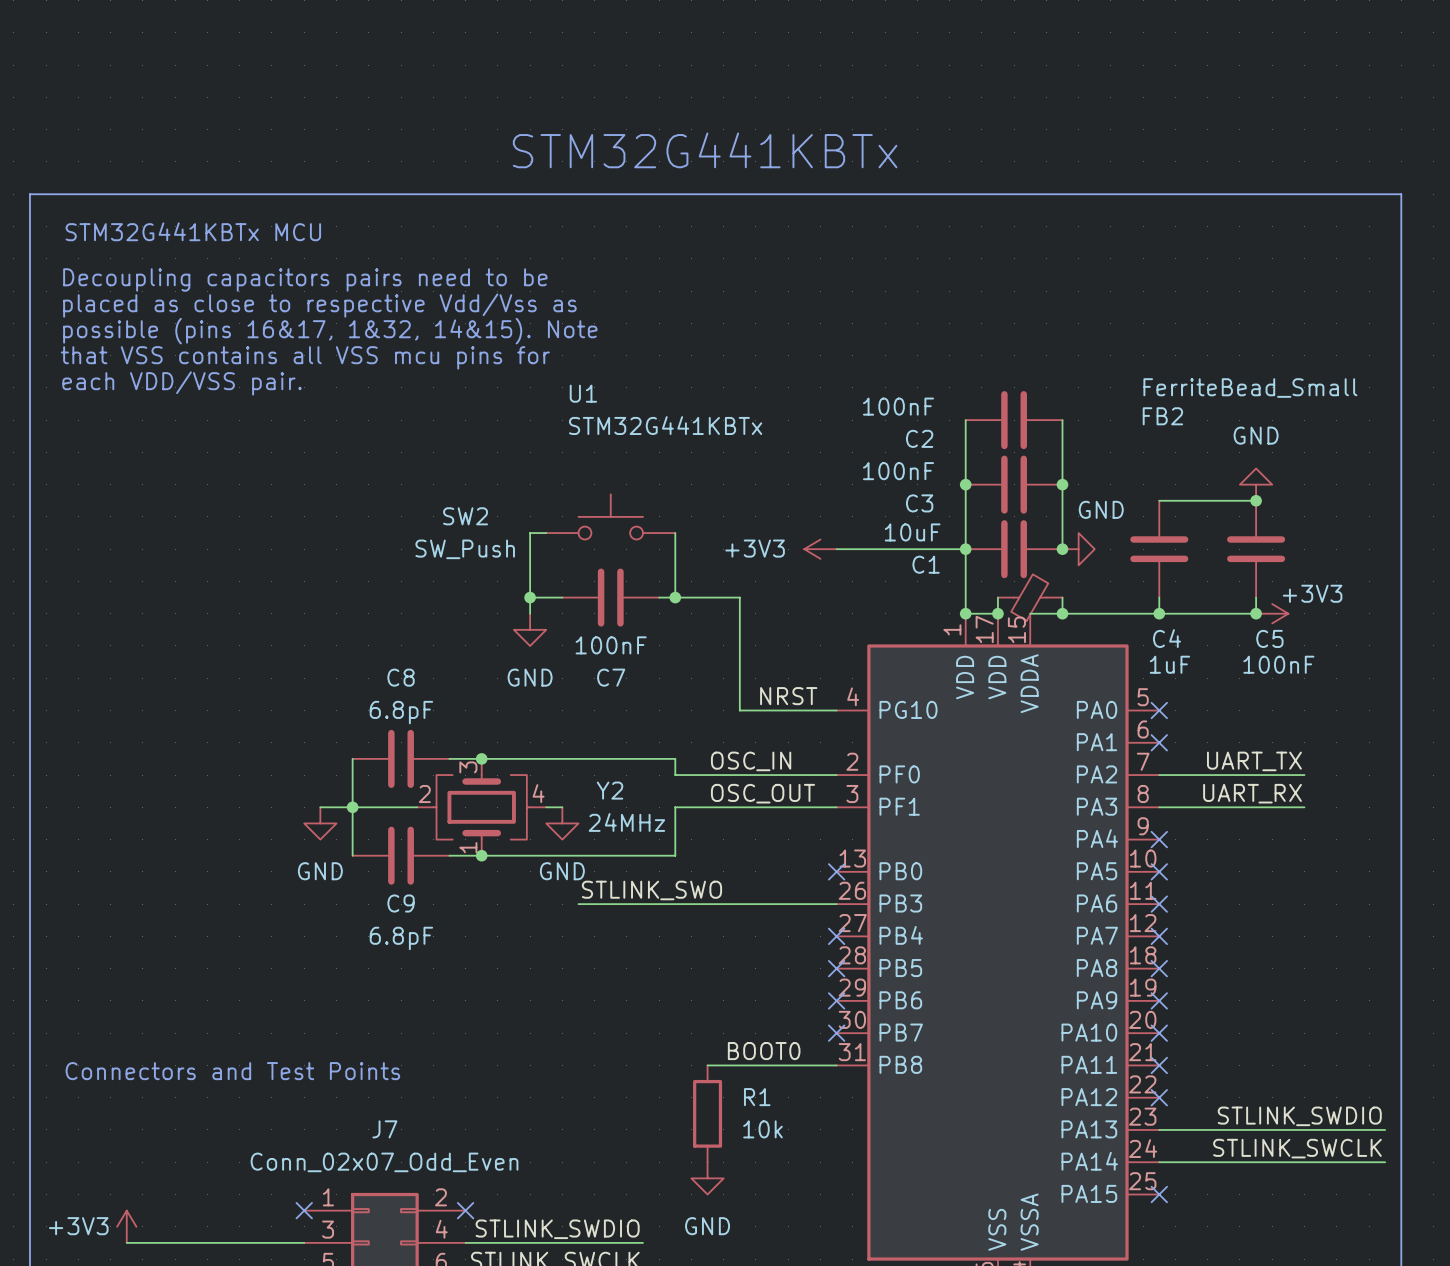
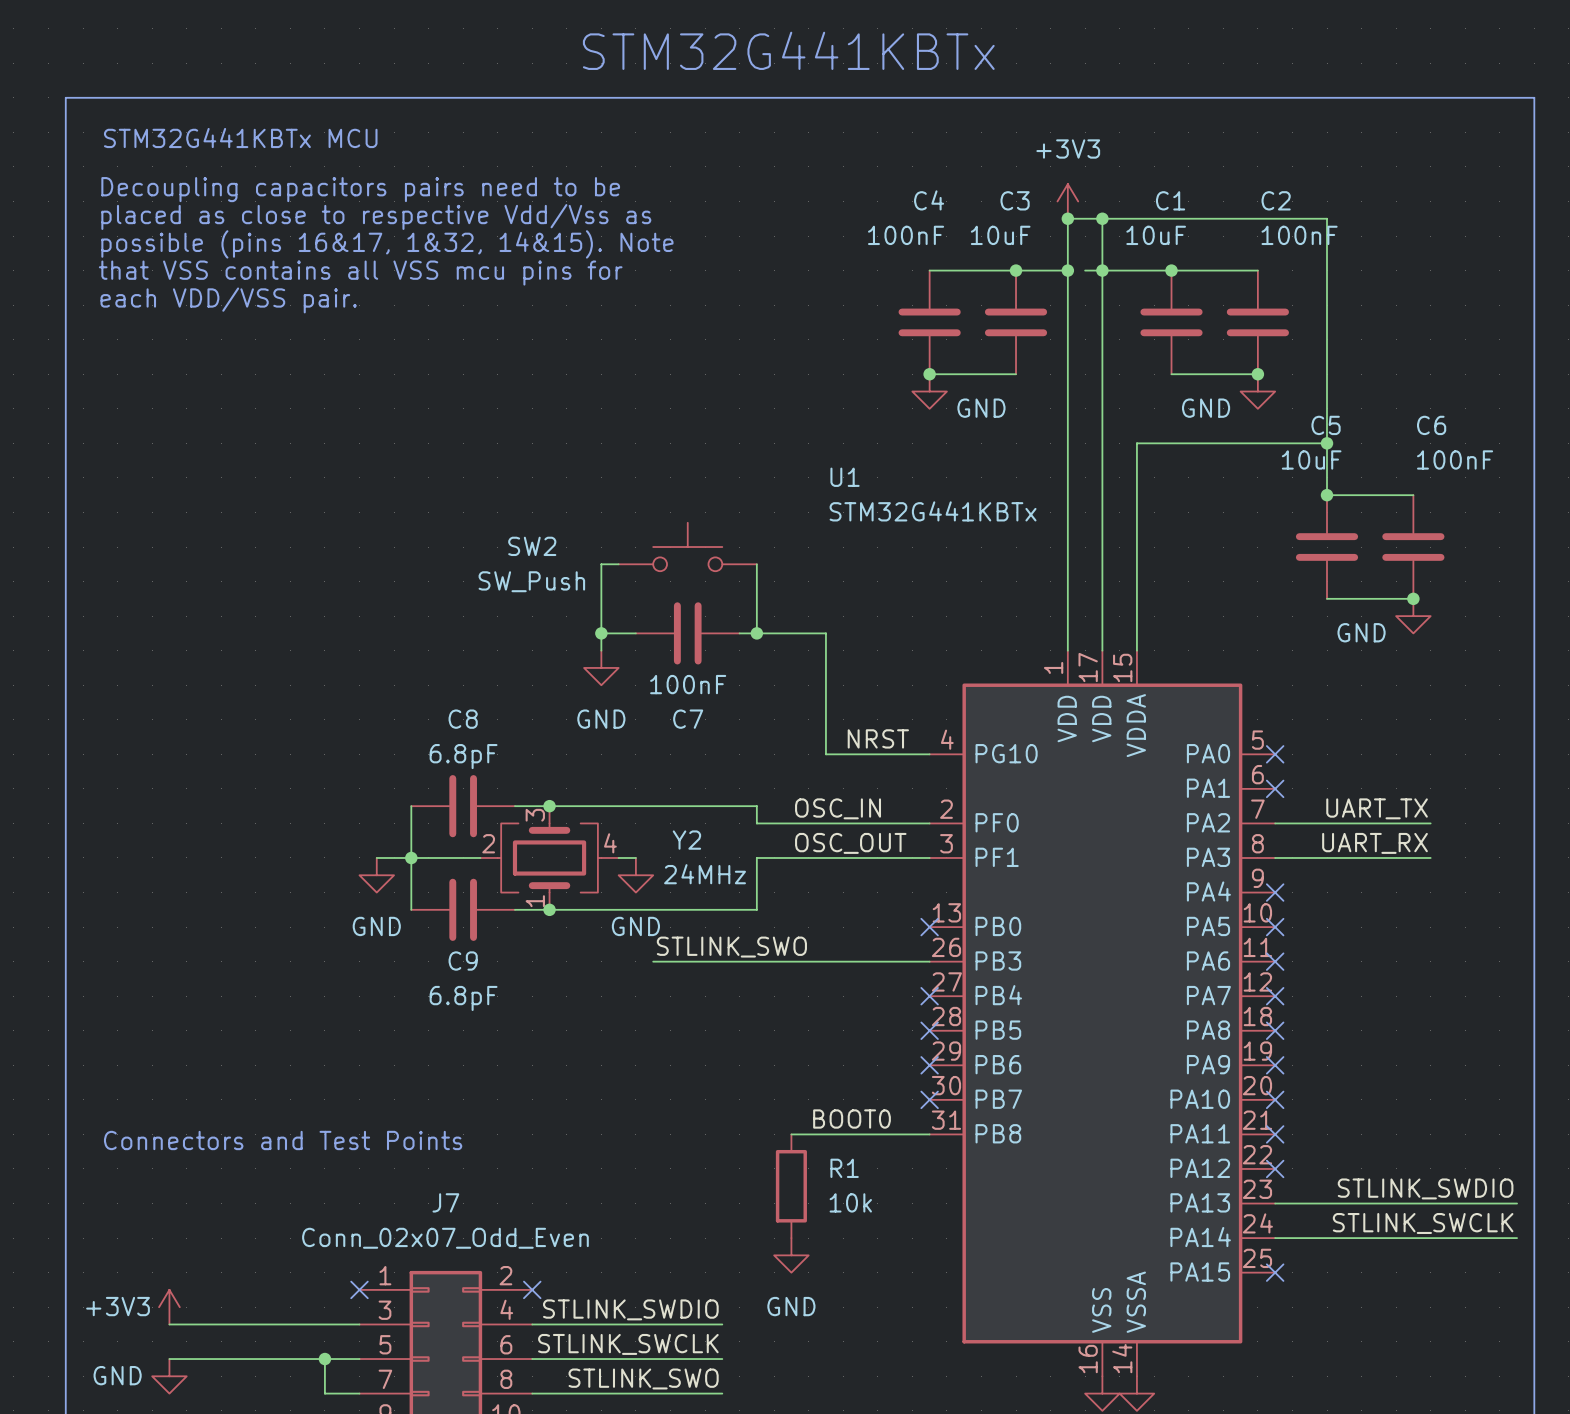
text position: STM32G441KBTx (705, 150) -> STM32G441KBTx (788, 50)
line: (29, 194) (1401, 194) -> (65, 201) (65, 97) (1534, 97) (1534, 201)
power symbol: none -> +3V3 (1067, 201)
junction: none -> (1067, 218)
wire: none -> (1102, 218) (1102, 633)
junction: none -> (1102, 218)
text position: STM32G441KBTx MCU (193, 231) -> STM32G441KBTx MCU (240, 138)
junction: none -> (1016, 270)
junction: none -> (1067, 270)
wire: none -> (1085, 270) (1257, 270)
junction: none -> (1102, 270)
junction: none -> (1171, 270)
text position: Decoupling capacitors pairs need to be (305, 279) -> Decoupling capacitors pairs need to be (360, 189)
text position: placed as close to respective Vdd/Vss as (319, 305) -> placed as close to respective Vdd/Vss as (376, 216)
text position: possible (pins 16&17, 1&32, 14&15). Note (330, 331) -> possible (pins 16&17, 1&32, 14&15). Note (387, 244)
wire: none -> (929, 374) (1016, 374)
junction: none -> (929, 374)
wire: none -> (1171, 374) (1257, 374)
junction: none -> (1257, 374)
text position: that VSS contains all VSS mcu pins for (305, 357) -> that VSS contains all VSS mcu pins for (360, 273)
power symbol: none -> GND (929, 391)
power symbol: none -> GND (1257, 391)
text position: each VDD/VSS pair. (182, 383) -> each VDD/VSS pair. (228, 300)
U1 name position: U1 (583, 393) -> U1 (845, 477)
C2 value position: 100nF (898, 406) -> 100nF (1299, 235)
wire: none -> (1067, 443) (1067, 218) (1327, 218) (1327, 495) (1413, 495)
C2 rotation: 0° (1014, 420) -> 90° clockwise (1257, 322)
C2 position: (1014, 420) -> (1257, 322)
wire: (1062, 420) (1062, 549) -> none
junction: none -> (1327, 443)
U1 value position: STM32G441KBTx (665, 425) -> STM32G441KBTx (933, 511)
C2 name position: C2 (919, 438) -> C2 (1276, 200)
junction: none -> (1327, 495)
C3 value: 100nF (898, 471) -> 10uF (1000, 235)
junction: (965, 484) -> none
C3 rotation: 0° (1014, 484) -> 90° clockwise (1016, 322)
C3 position: (1014, 484) -> (1016, 322)
junction: (1062, 484) -> none
power symbol: GND (1256, 484) -> none
wire: (1159, 500) (1256, 500) -> none
junction: (1256, 500) -> none
C6: none -> 100nF (1413, 547)
C1 value position: 10uF (912, 532) -> 10uF (1156, 235)
power symbol: +3V3 (820, 549) -> none
wire: (836, 549) (965, 549) -> (929, 270) (1067, 270)
junction: (965, 549) -> none
C1 rotation: 0° (1014, 549) -> 90° clockwise (1171, 322)
C1 position: (1014, 549) -> (1171, 322)
junction: (1062, 549) -> none
power symbol: GND (1078, 549) -> none
C4 position: (1159, 549) -> (929, 322)
C5 position: (1256, 549) -> (1327, 547)
wire: none -> (1327, 598) (1413, 598)
junction: none -> (1413, 598)
power symbol: none -> GND (1413, 616)
FB2: FerriteBead_Small (1030, 597) -> none
wire: (1062, 597) (1062, 613) -> none
wire: (1159, 597) (1159, 613) -> none
wire: (1256, 597) (1256, 613) (1030, 613) -> (1327, 443) (1136, 443) (1136, 650)
wire: (965, 613) (997, 613) -> none
junction: (965, 613) -> none
junction: (997, 613) -> none
junction: (1062, 613) -> none
junction: (1159, 613) -> none
junction: (1256, 613) -> none
power symbol: +3V3 (1272, 613) -> none
C4 name position: C4 (1167, 638) -> C4 (929, 200)
C5 name position: C5 (1269, 638) -> C5 (1326, 425)
C4 value: 1uF (1169, 664) -> 100nF (906, 235)
C5 value: 100nF (1278, 664) -> 10uF (1311, 459)

